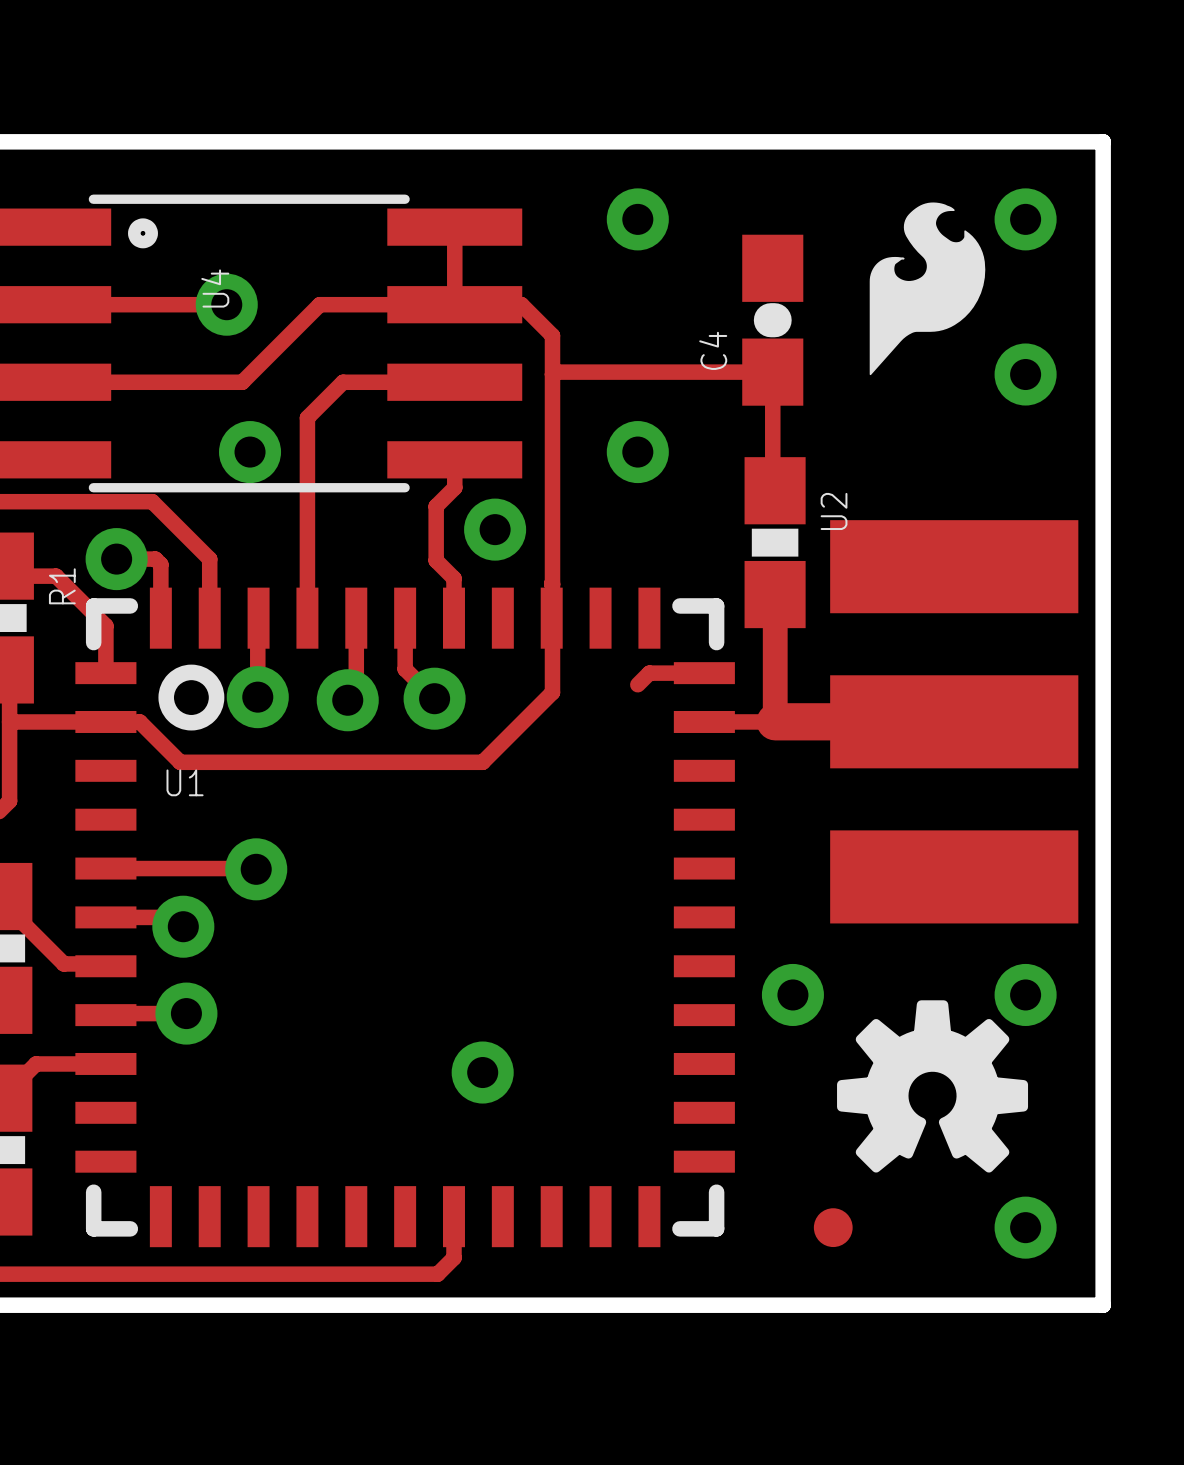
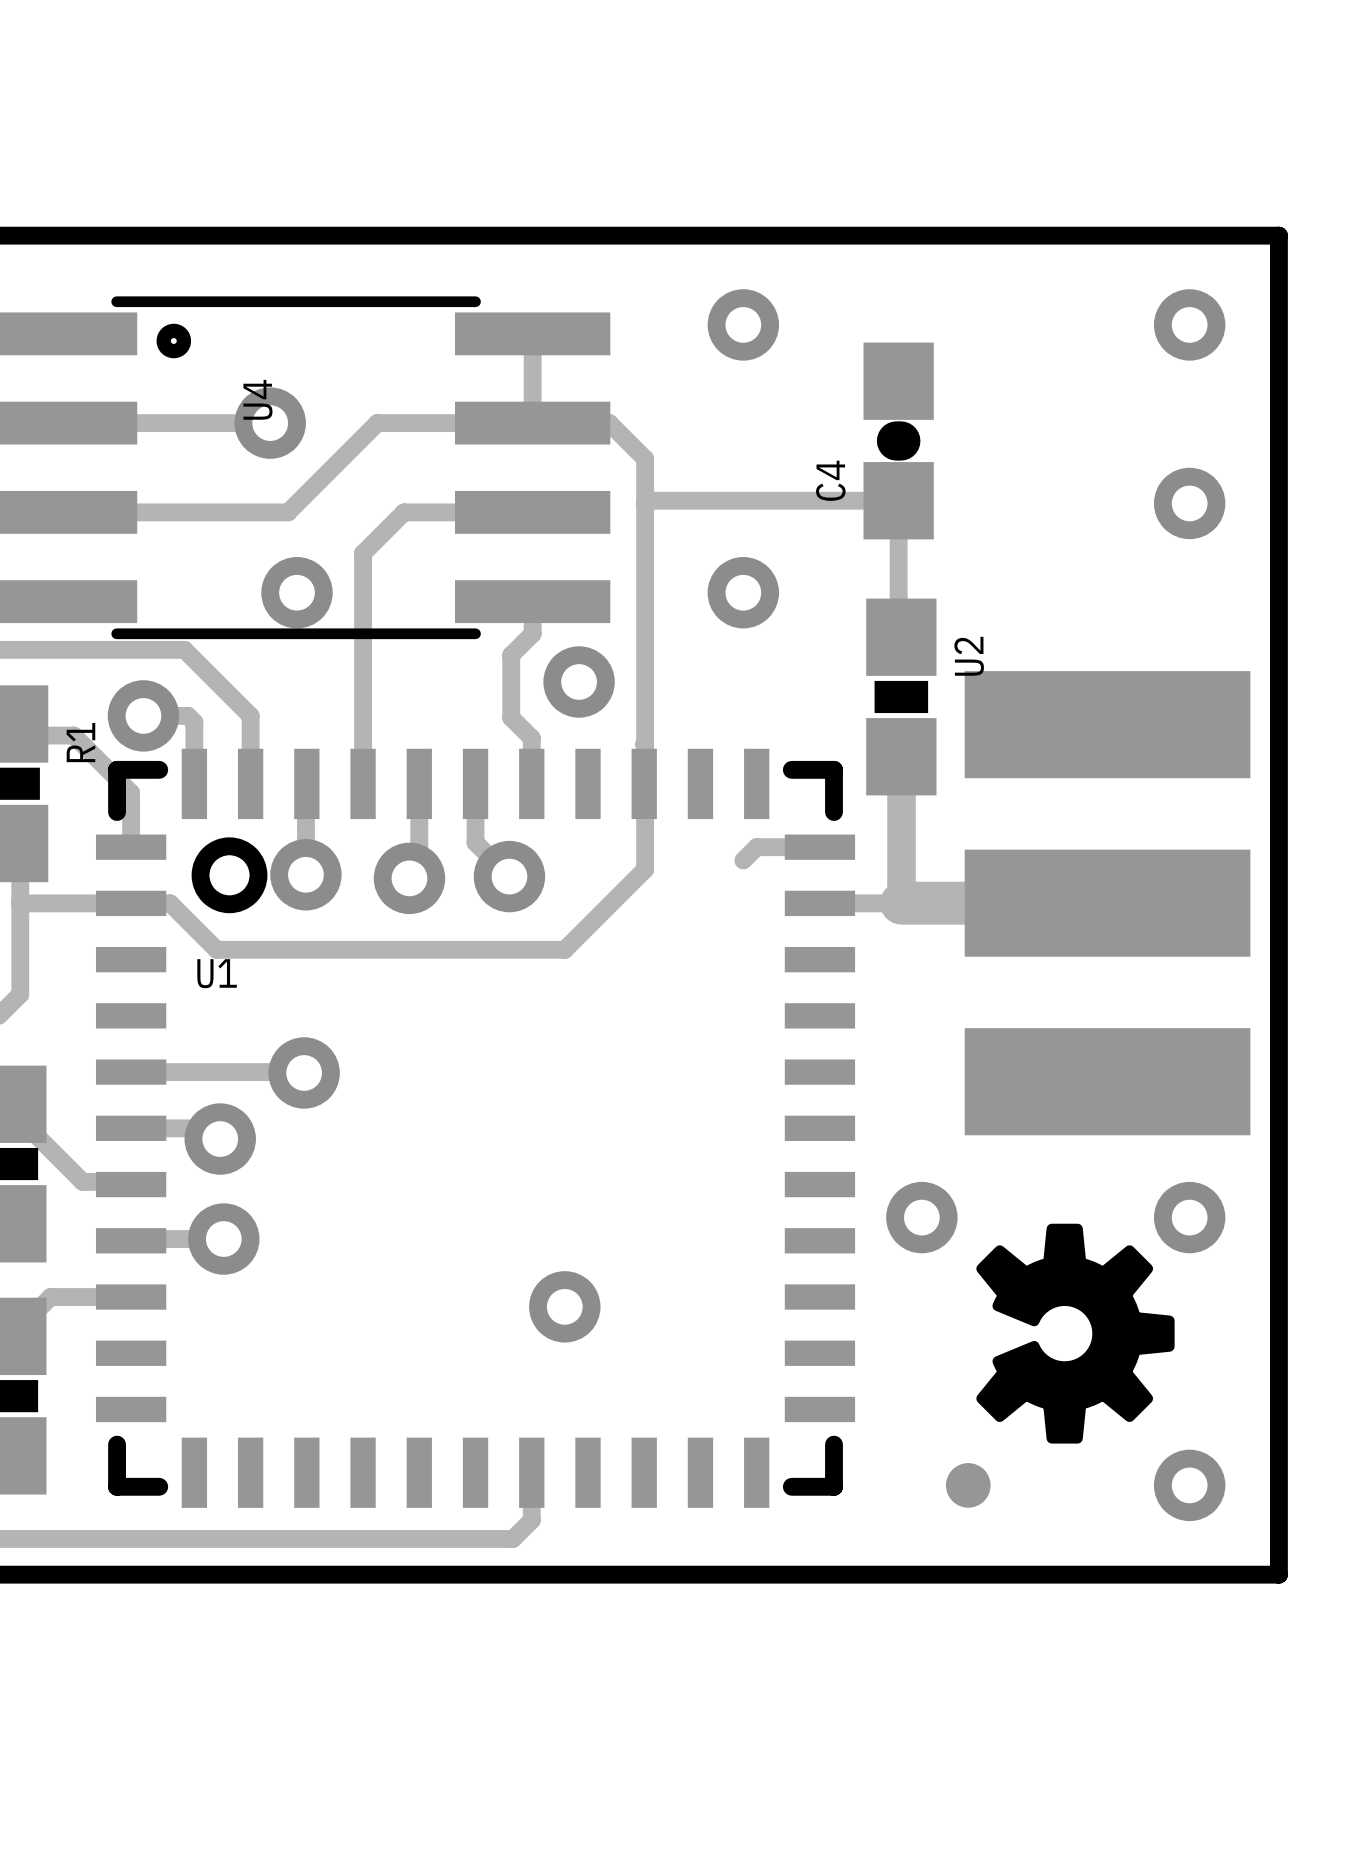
drawing: [869, 202, 986, 376] -> none
drawing shape: [837, 1000, 1029, 1173] -> [976, 1223, 1175, 1444]

